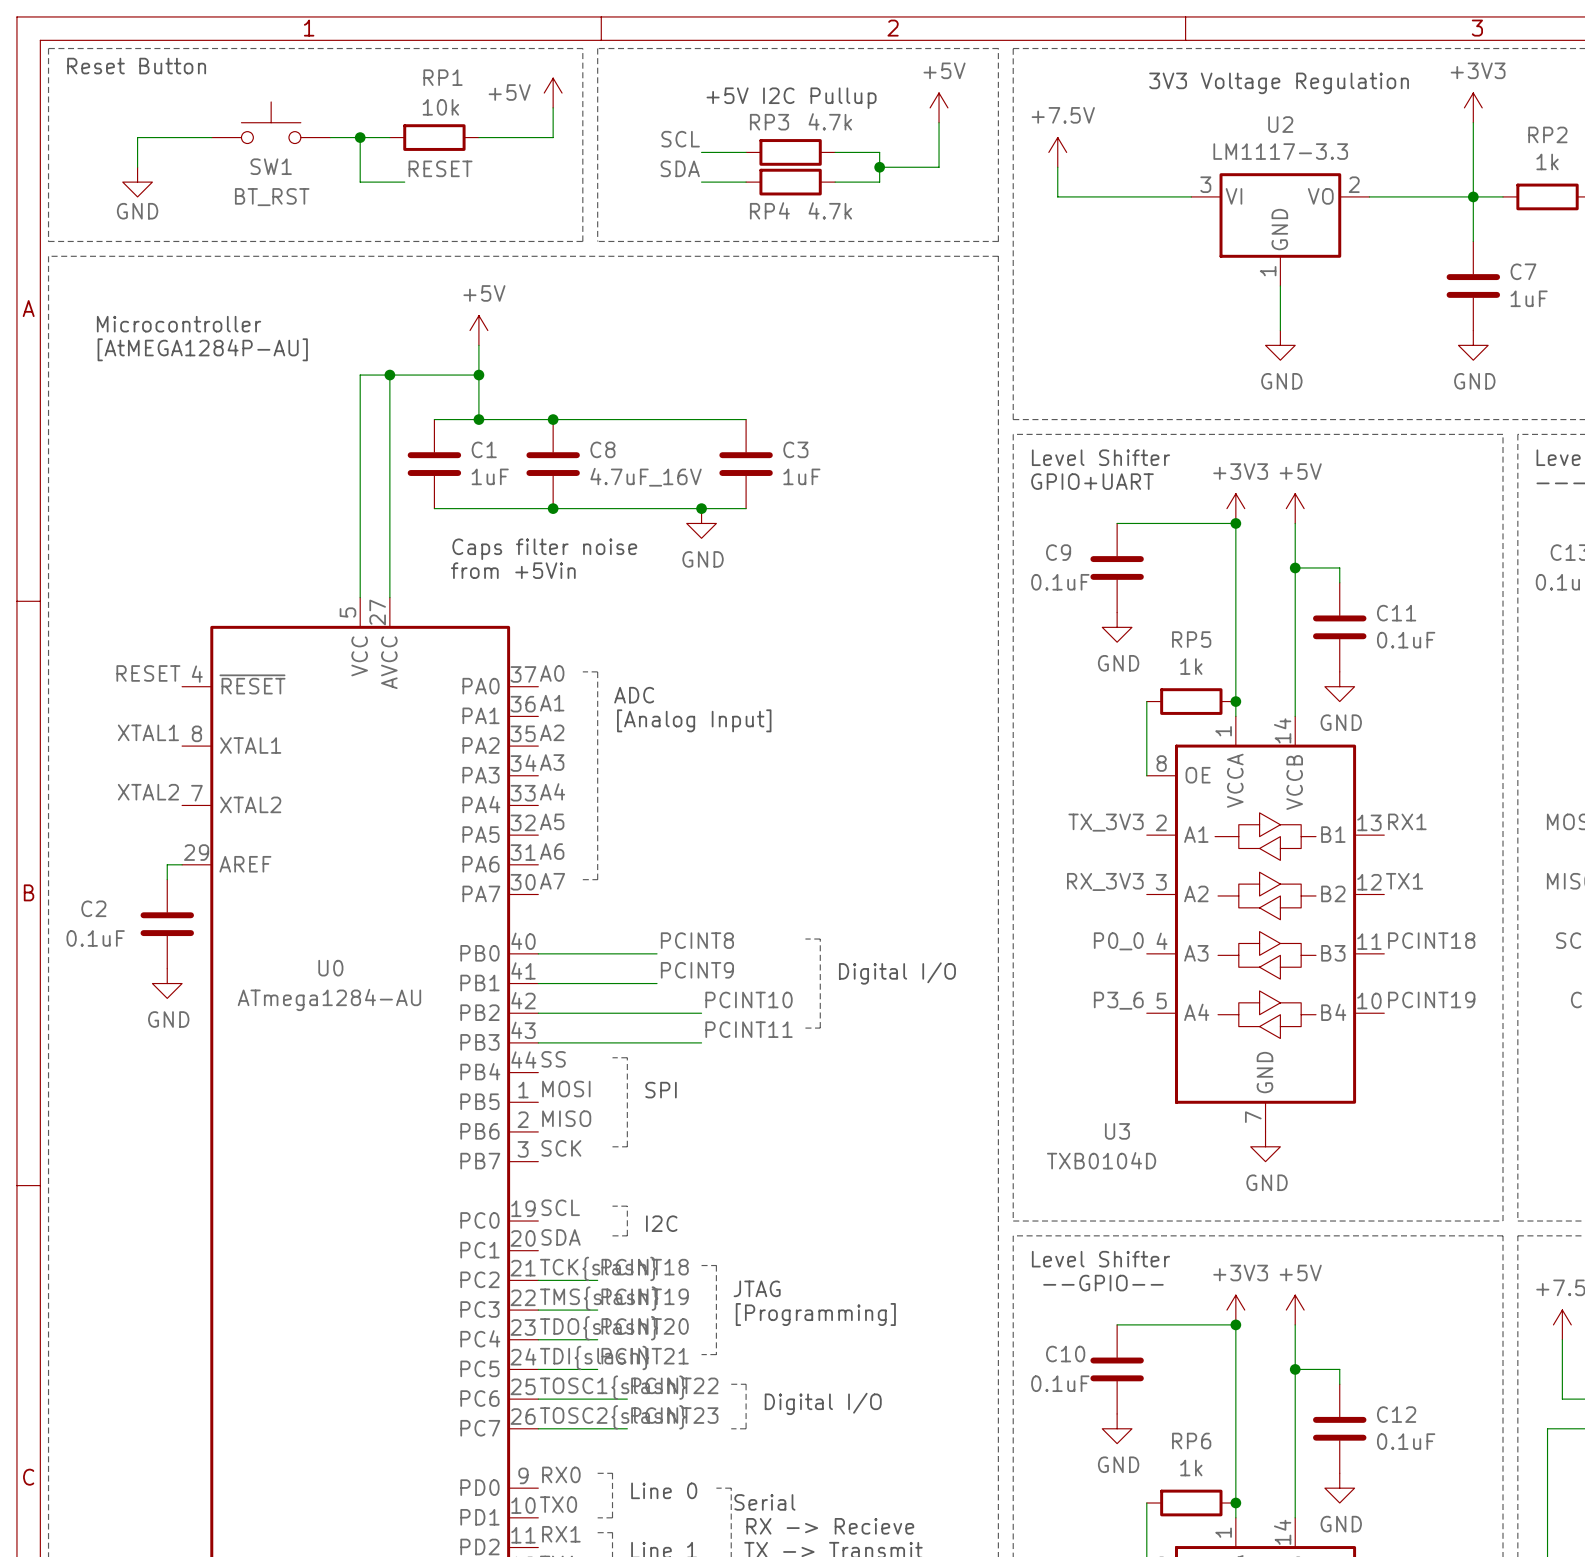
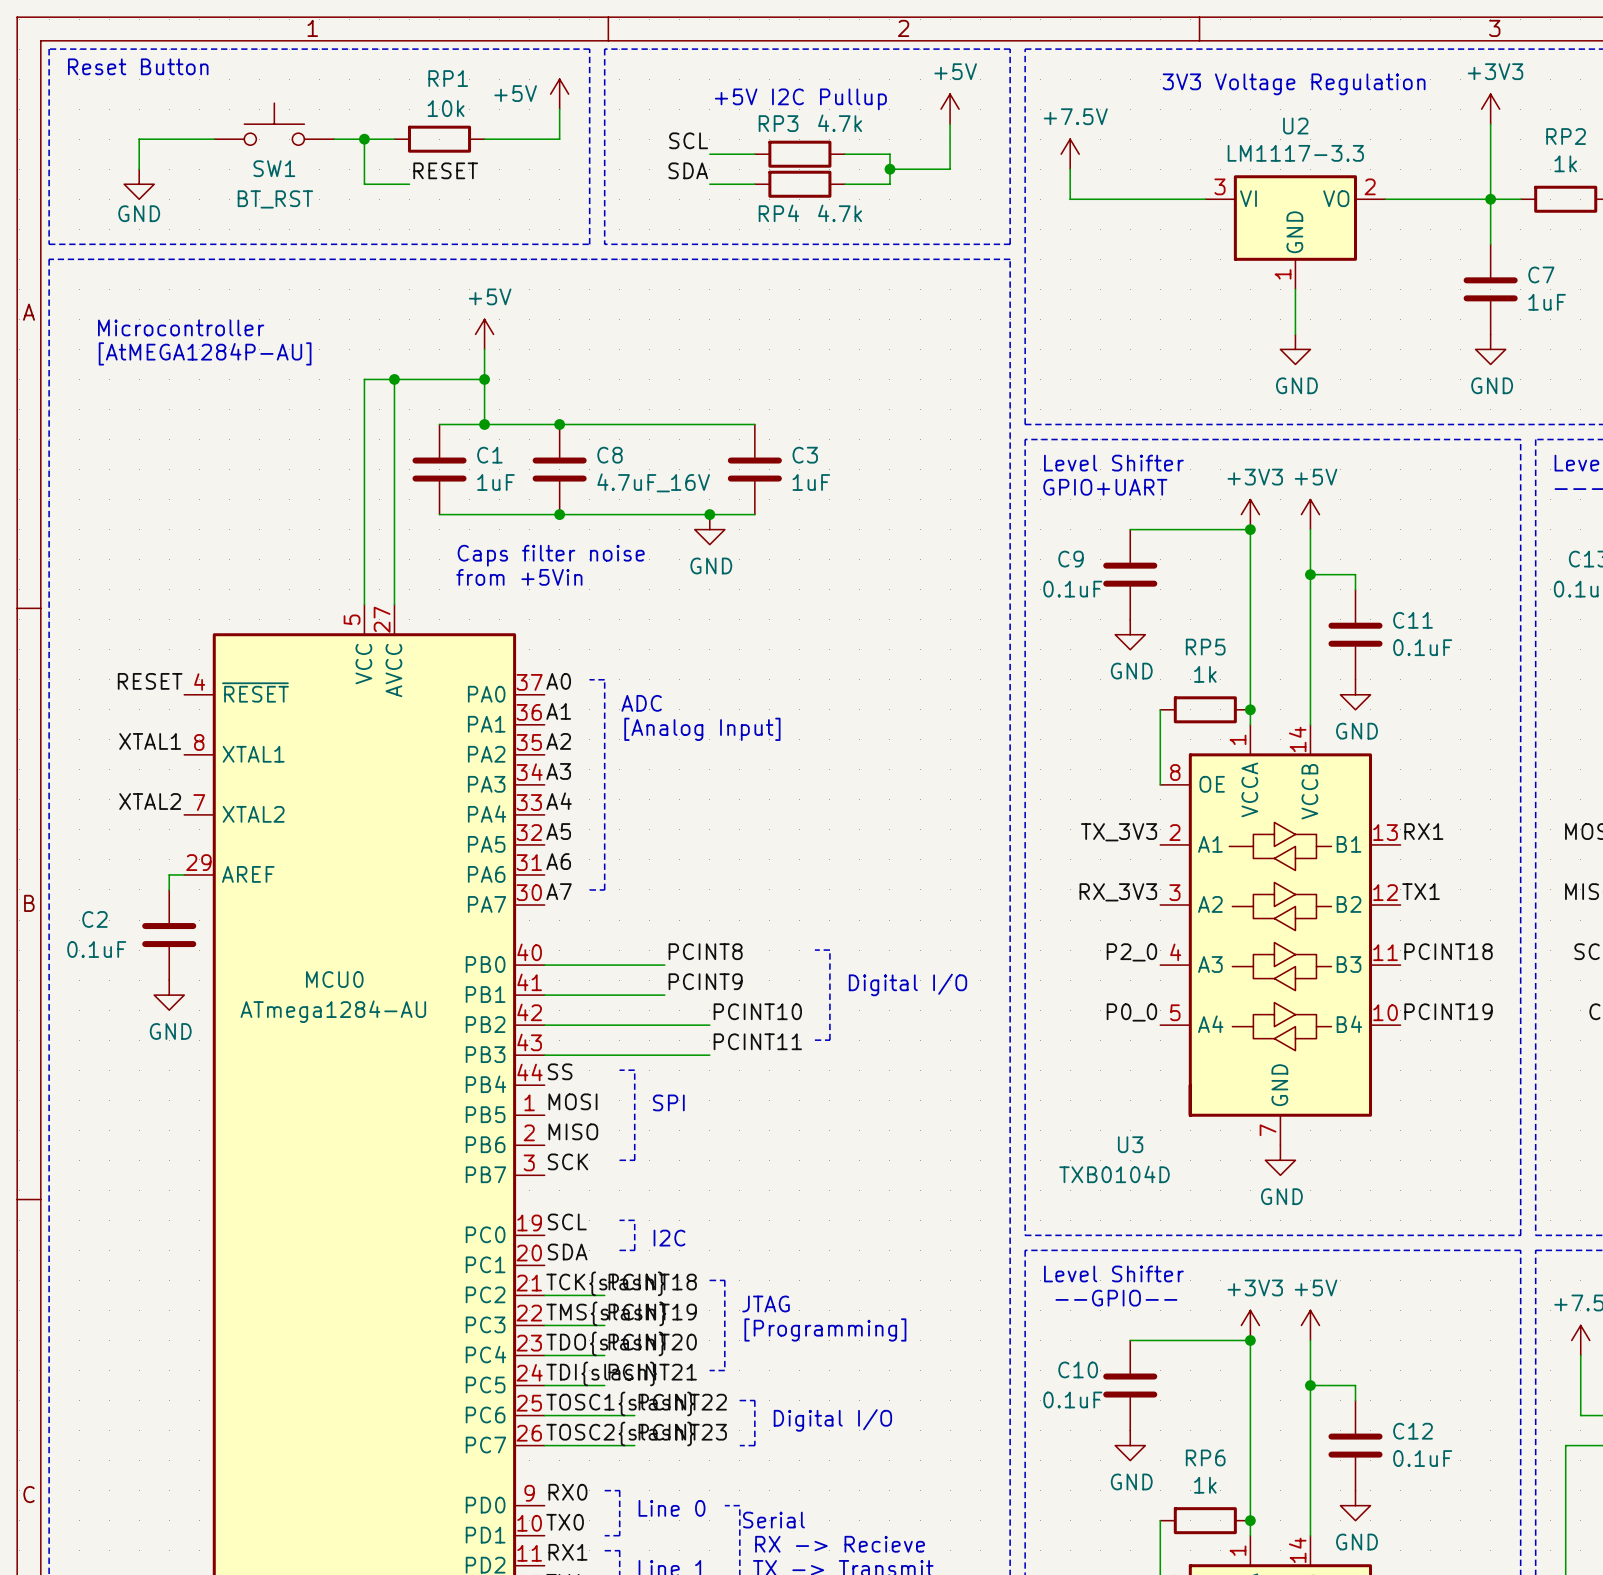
label: P0_0 (1118, 941) -> P2_0 (1131, 952)
U0 name: U0 (330, 968) -> MCU0 (334, 979)
label: P3_6 (1118, 1000) -> P0_0 (1131, 1012)

